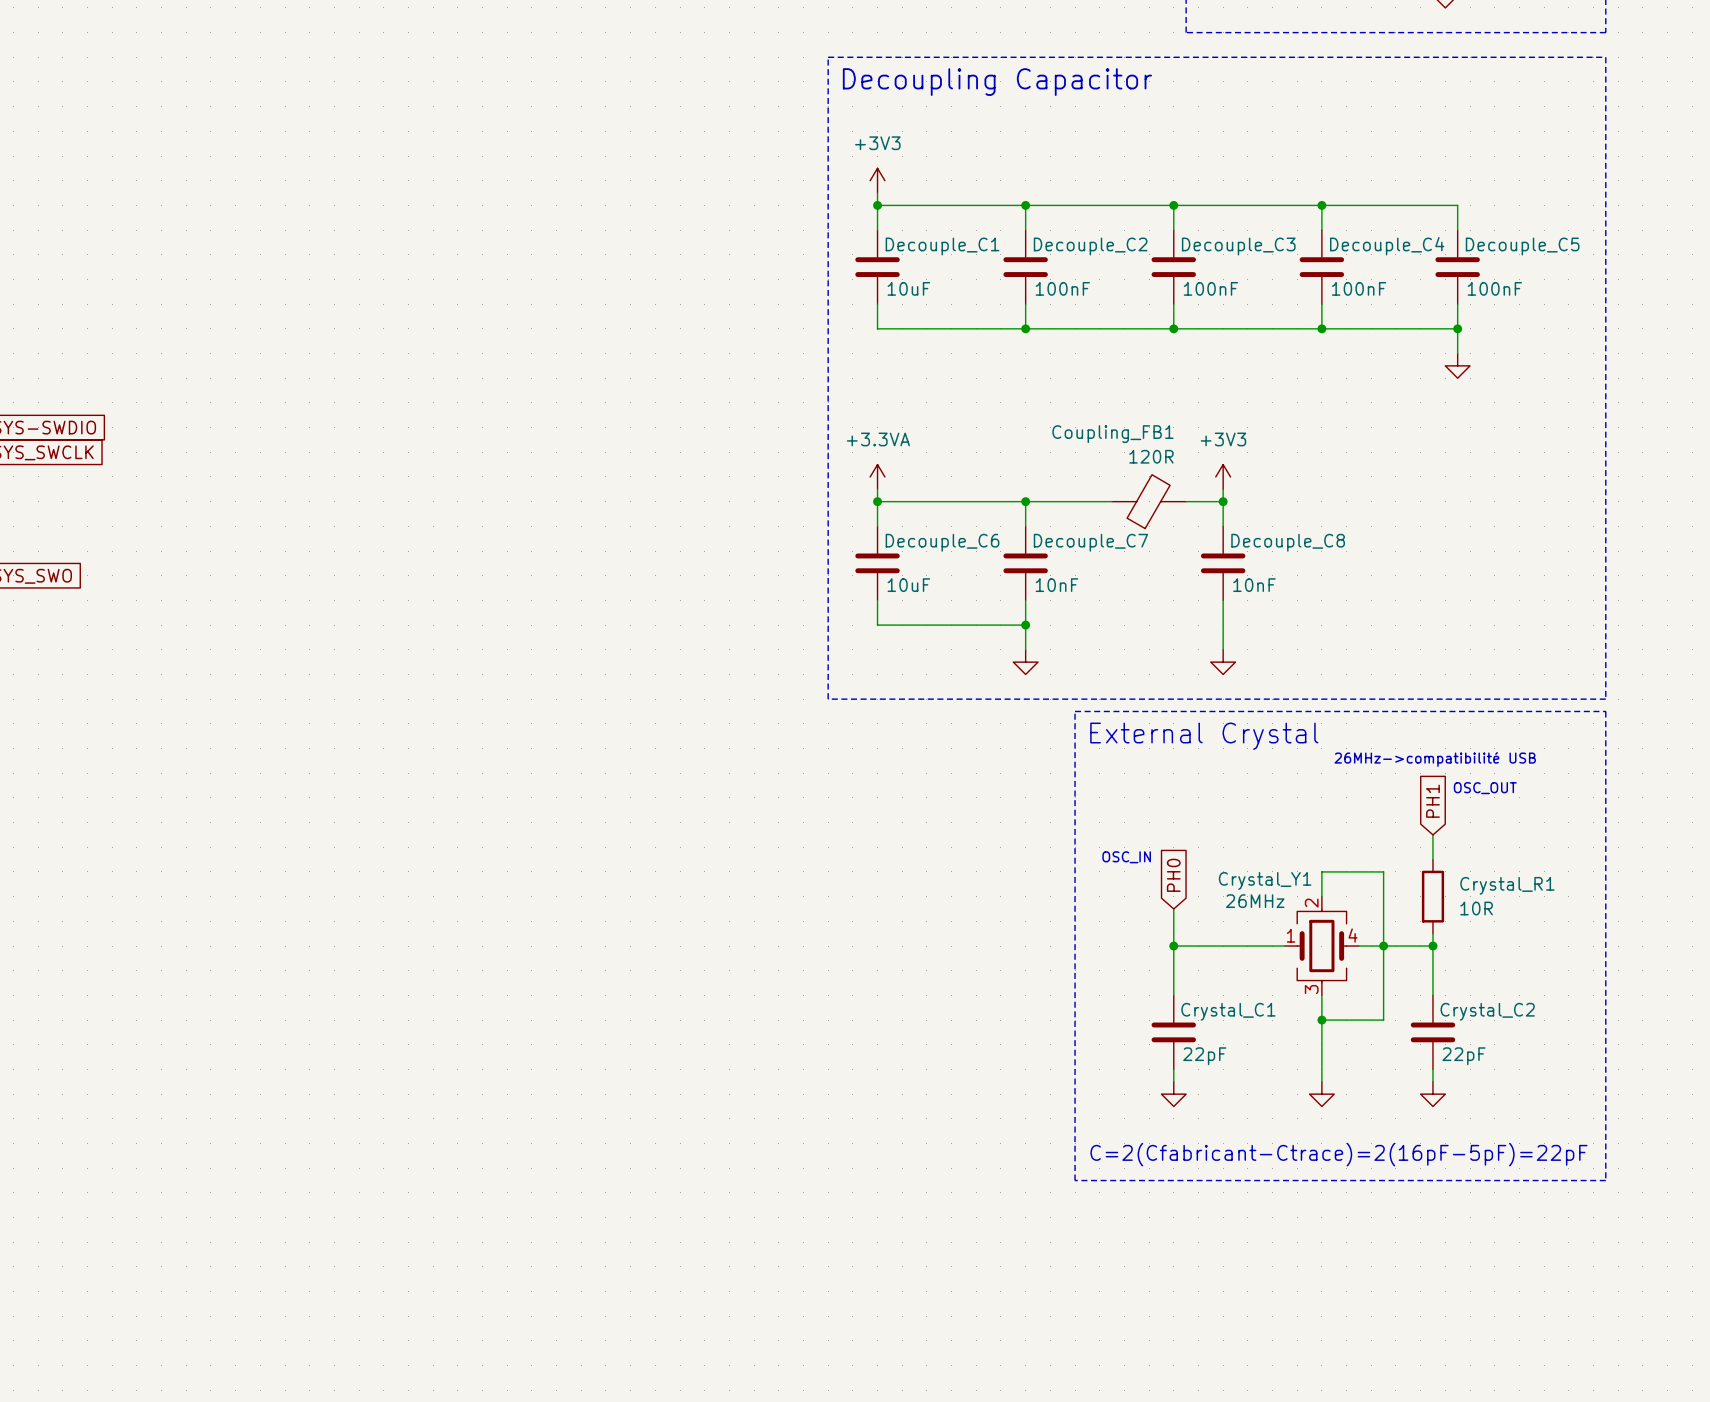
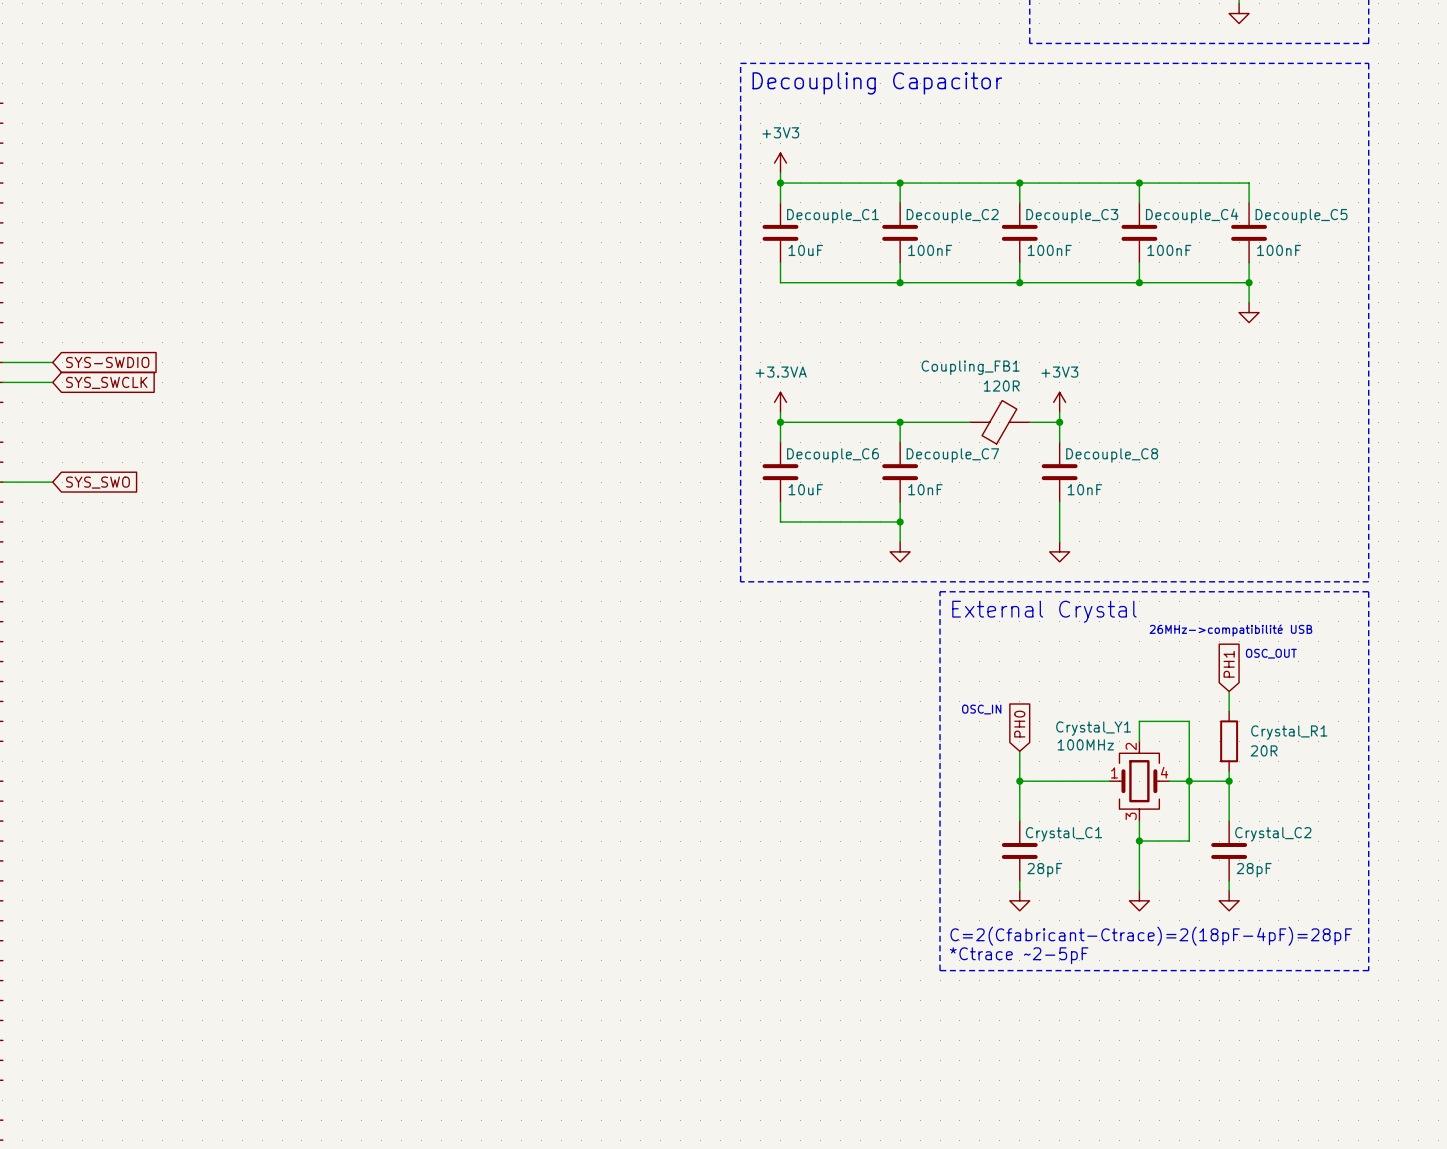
Crystal_Y1 value: 26MHz (1255, 901) -> 100MHz (1085, 744)
Crystal_R1 value: 10R (1476, 908) -> 20R (1264, 750)
Crystal_C1 value: 22pF (1204, 1056) -> 28pF (1044, 870)
Crystal_C2 value: 22pF (1463, 1056) -> 28pF (1254, 870)
text: none -> C=2(Cfabricant-Ctrace)=2(18pF-4pF)=28pF (1151, 936)
text: C=2(Cfabricant-Ctrace)=2(16pF-5pF)=22pF (1338, 1154) -> *Ctrace ~2-5pF (1019, 955)

